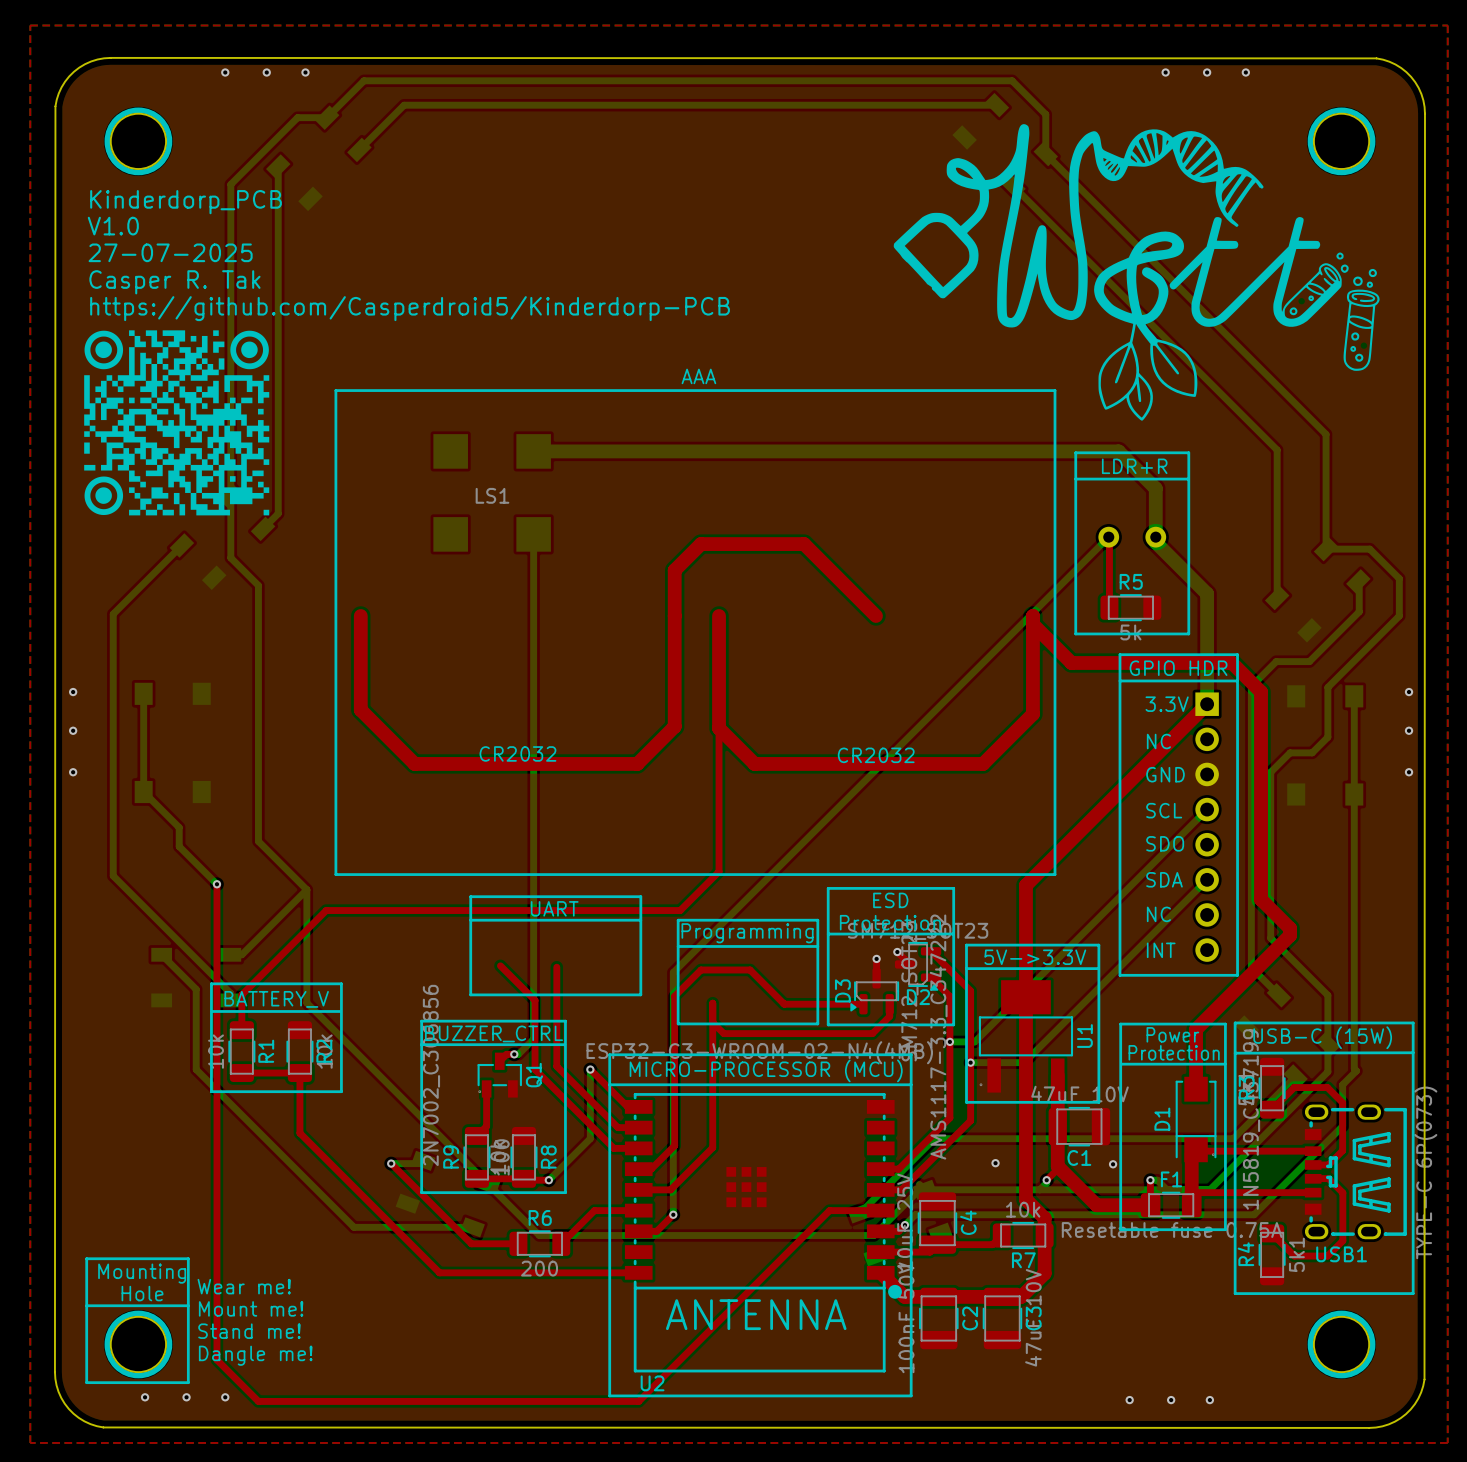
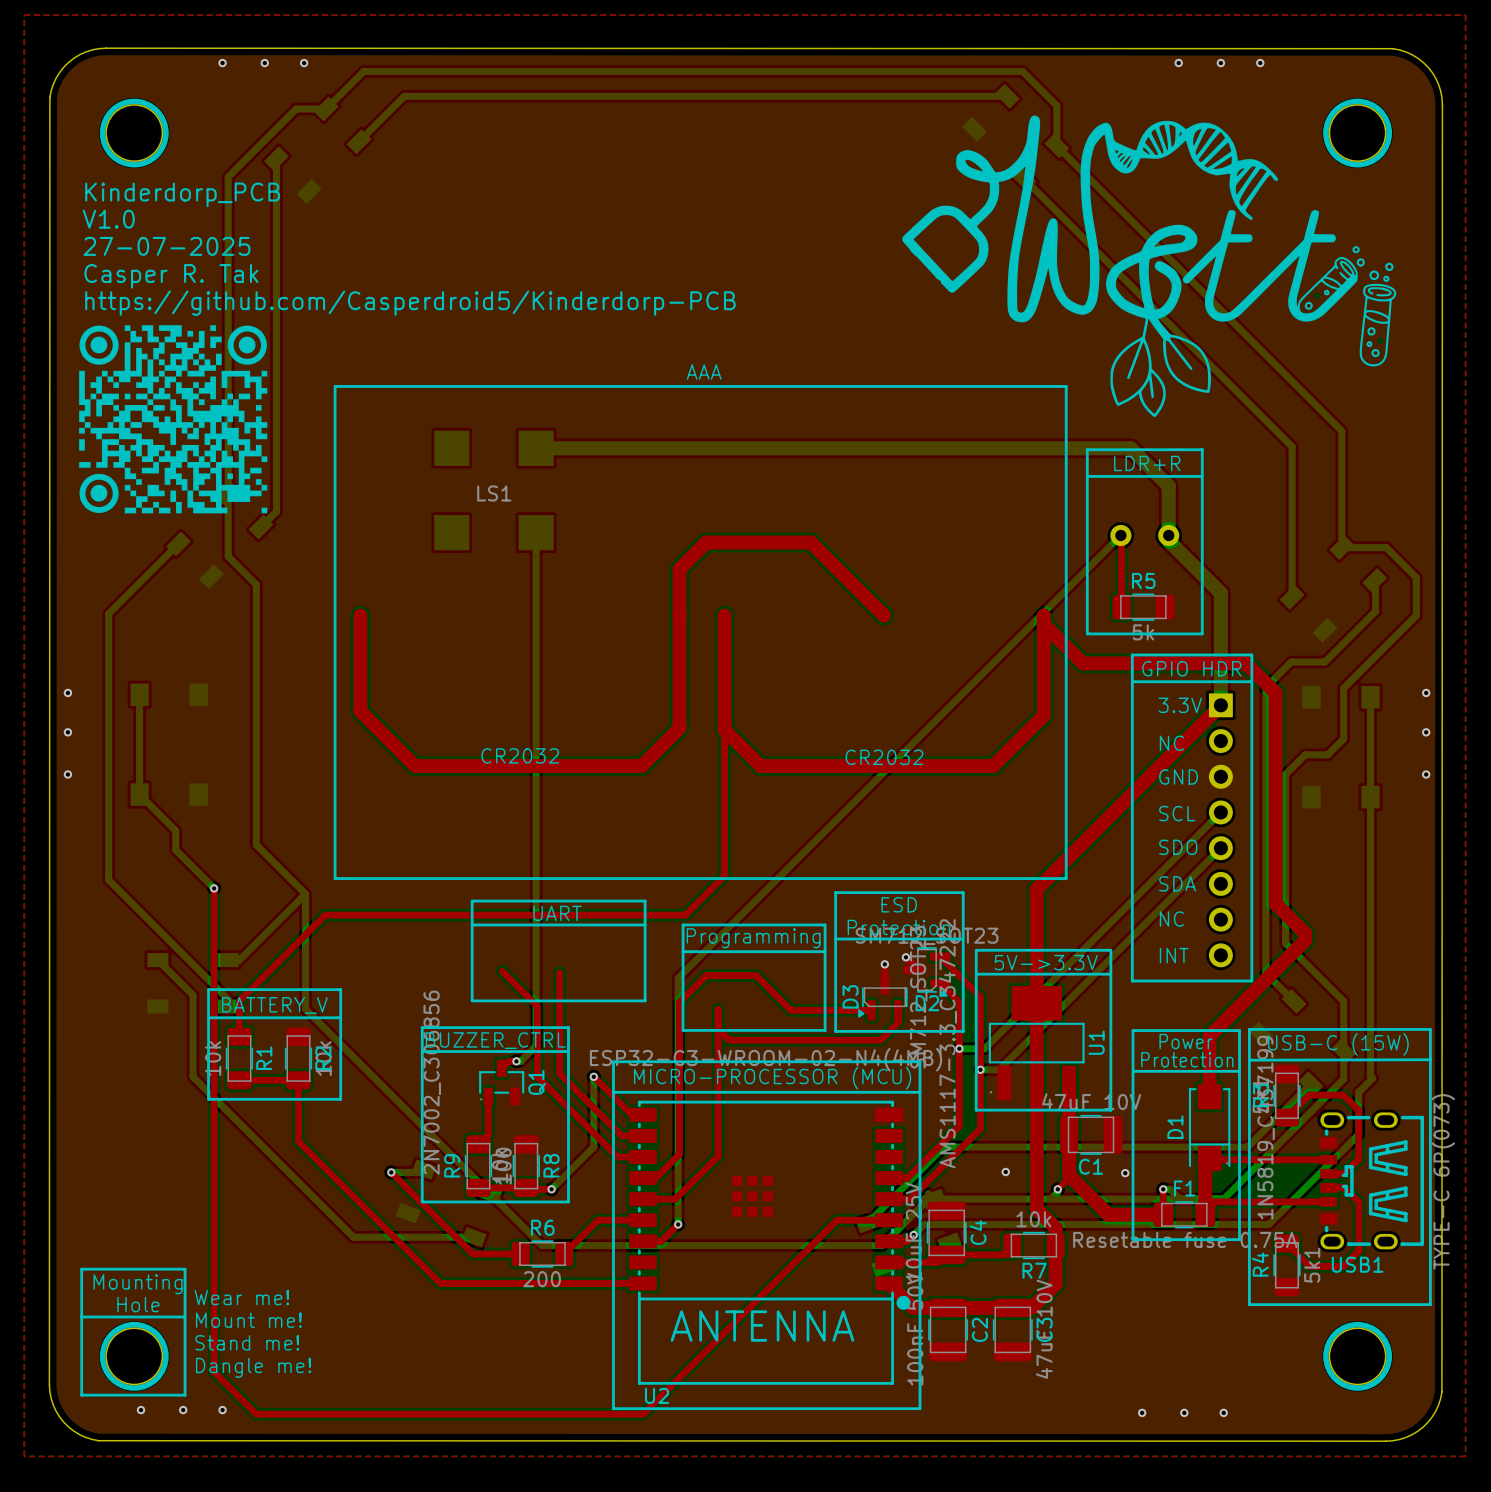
bottom track: (1207, 879) (1024, 1062) (989, 1062) -> (1220, 848) (999, 1069)

